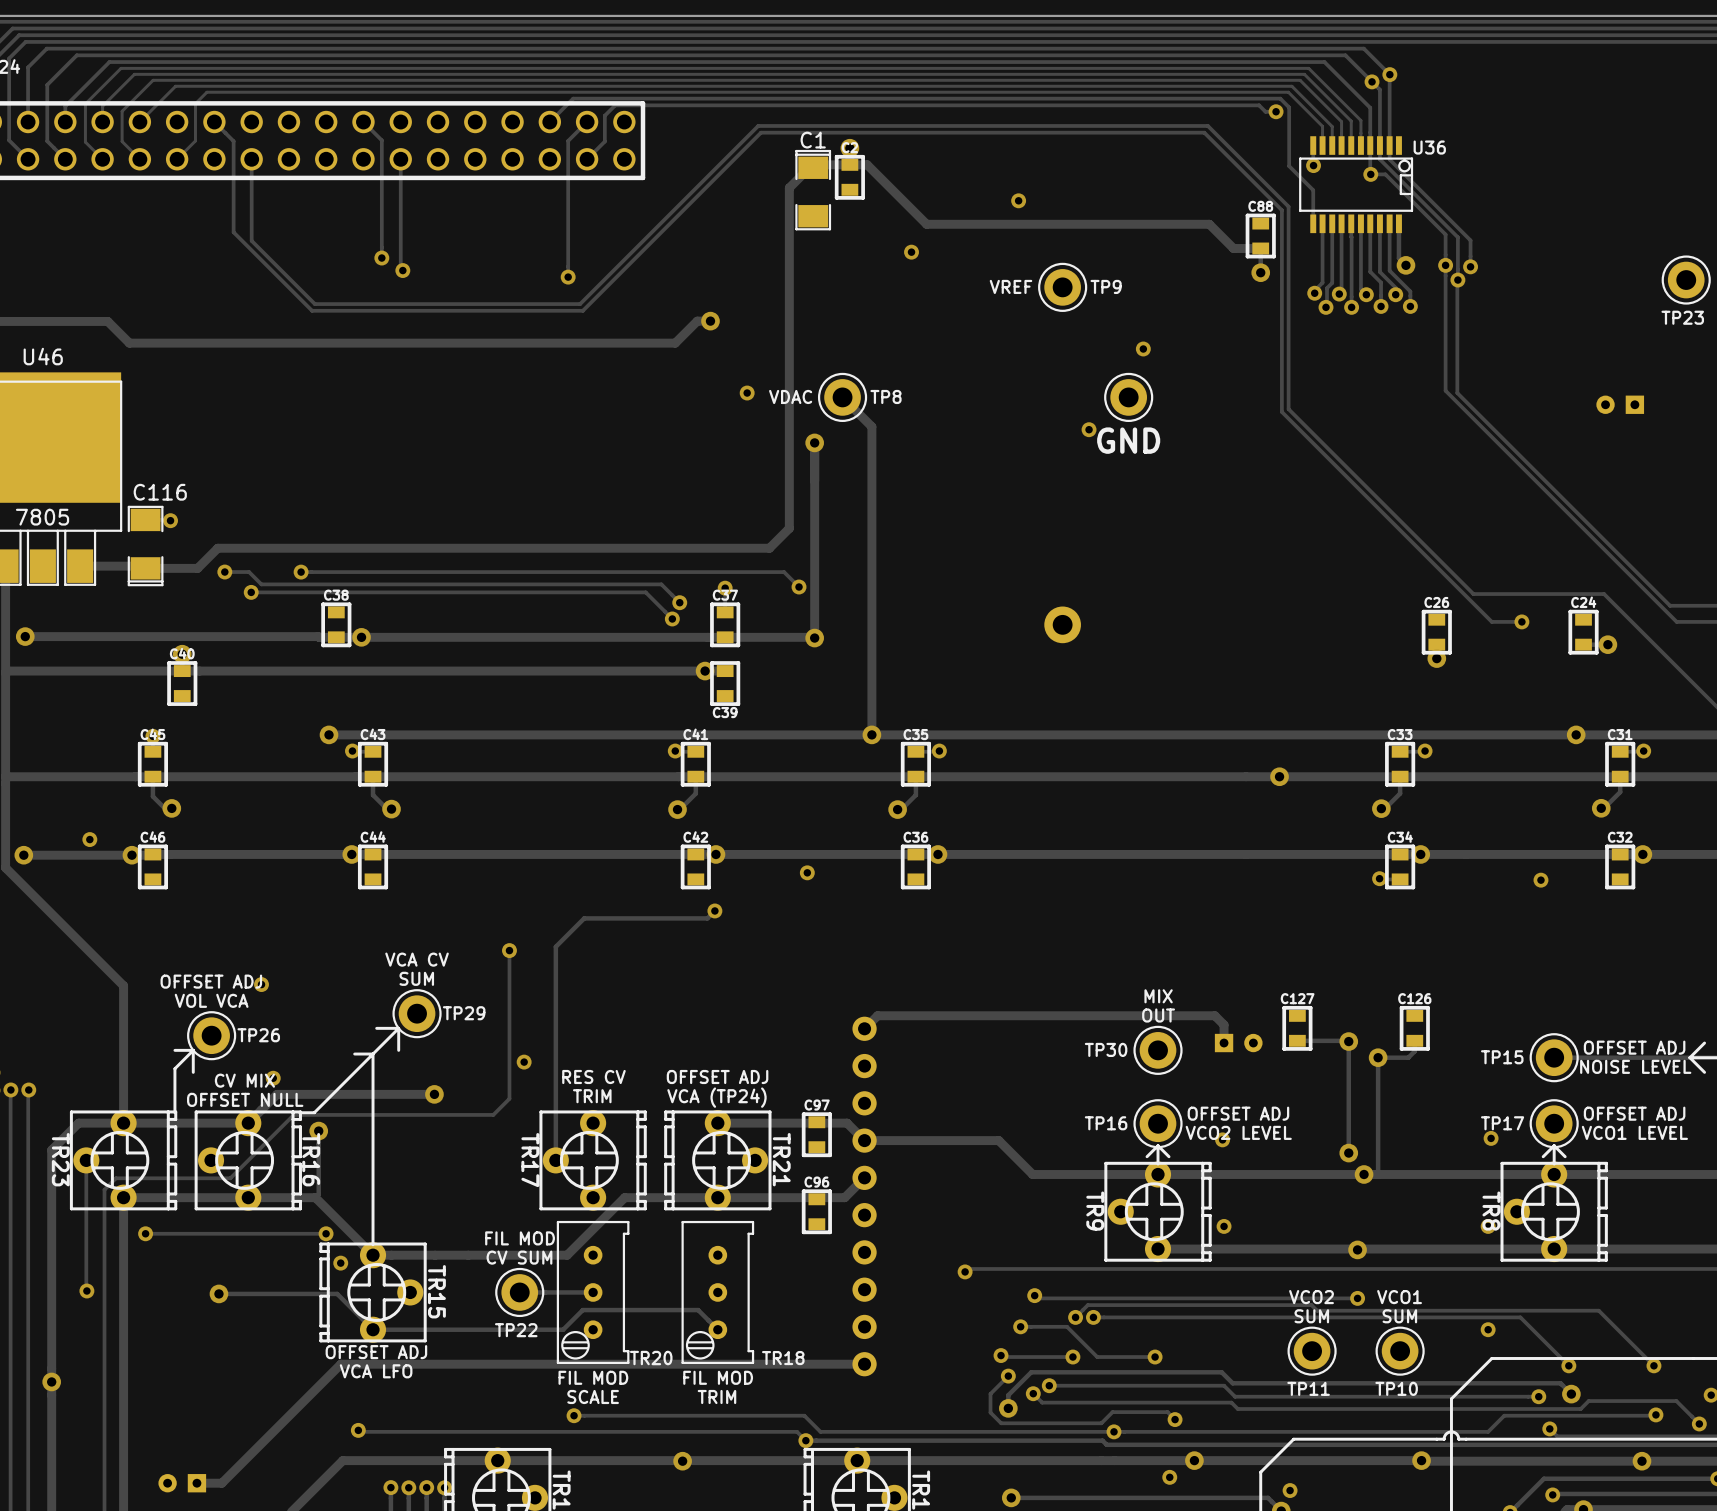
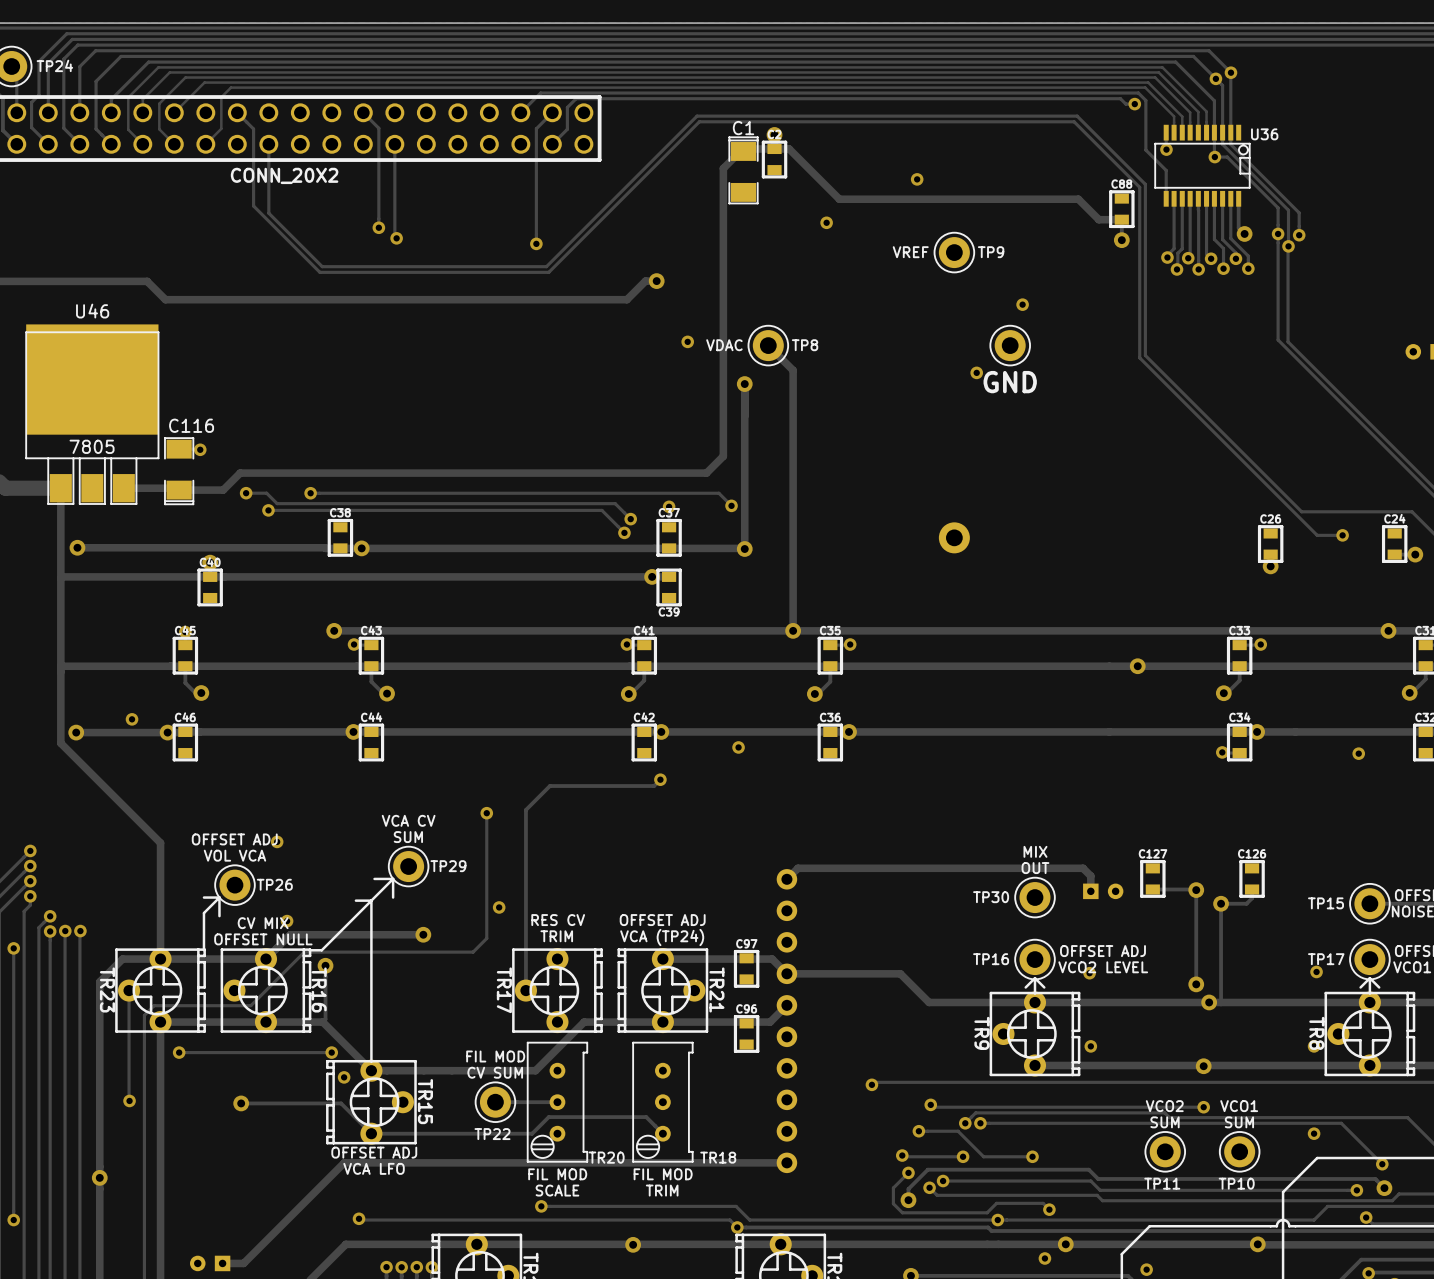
part value: none -> CONN_20X2 (284, 175)

